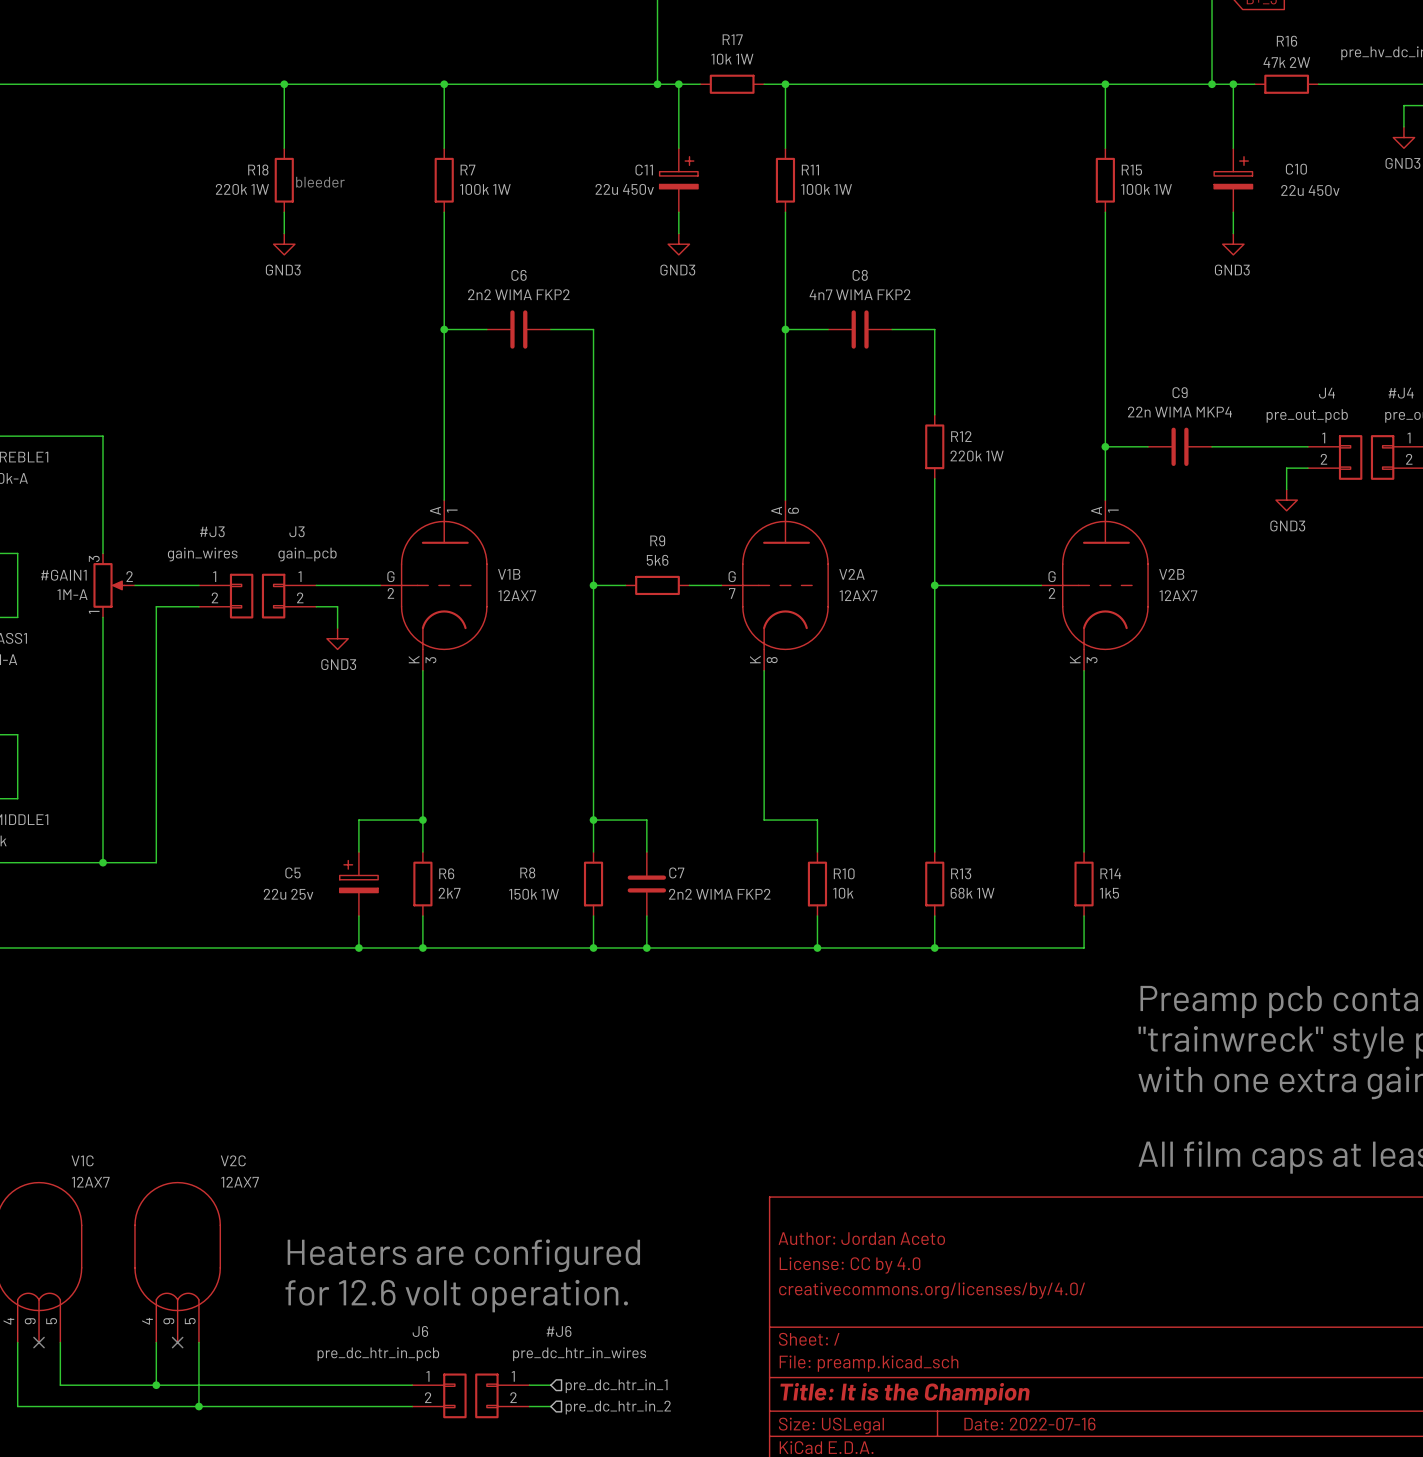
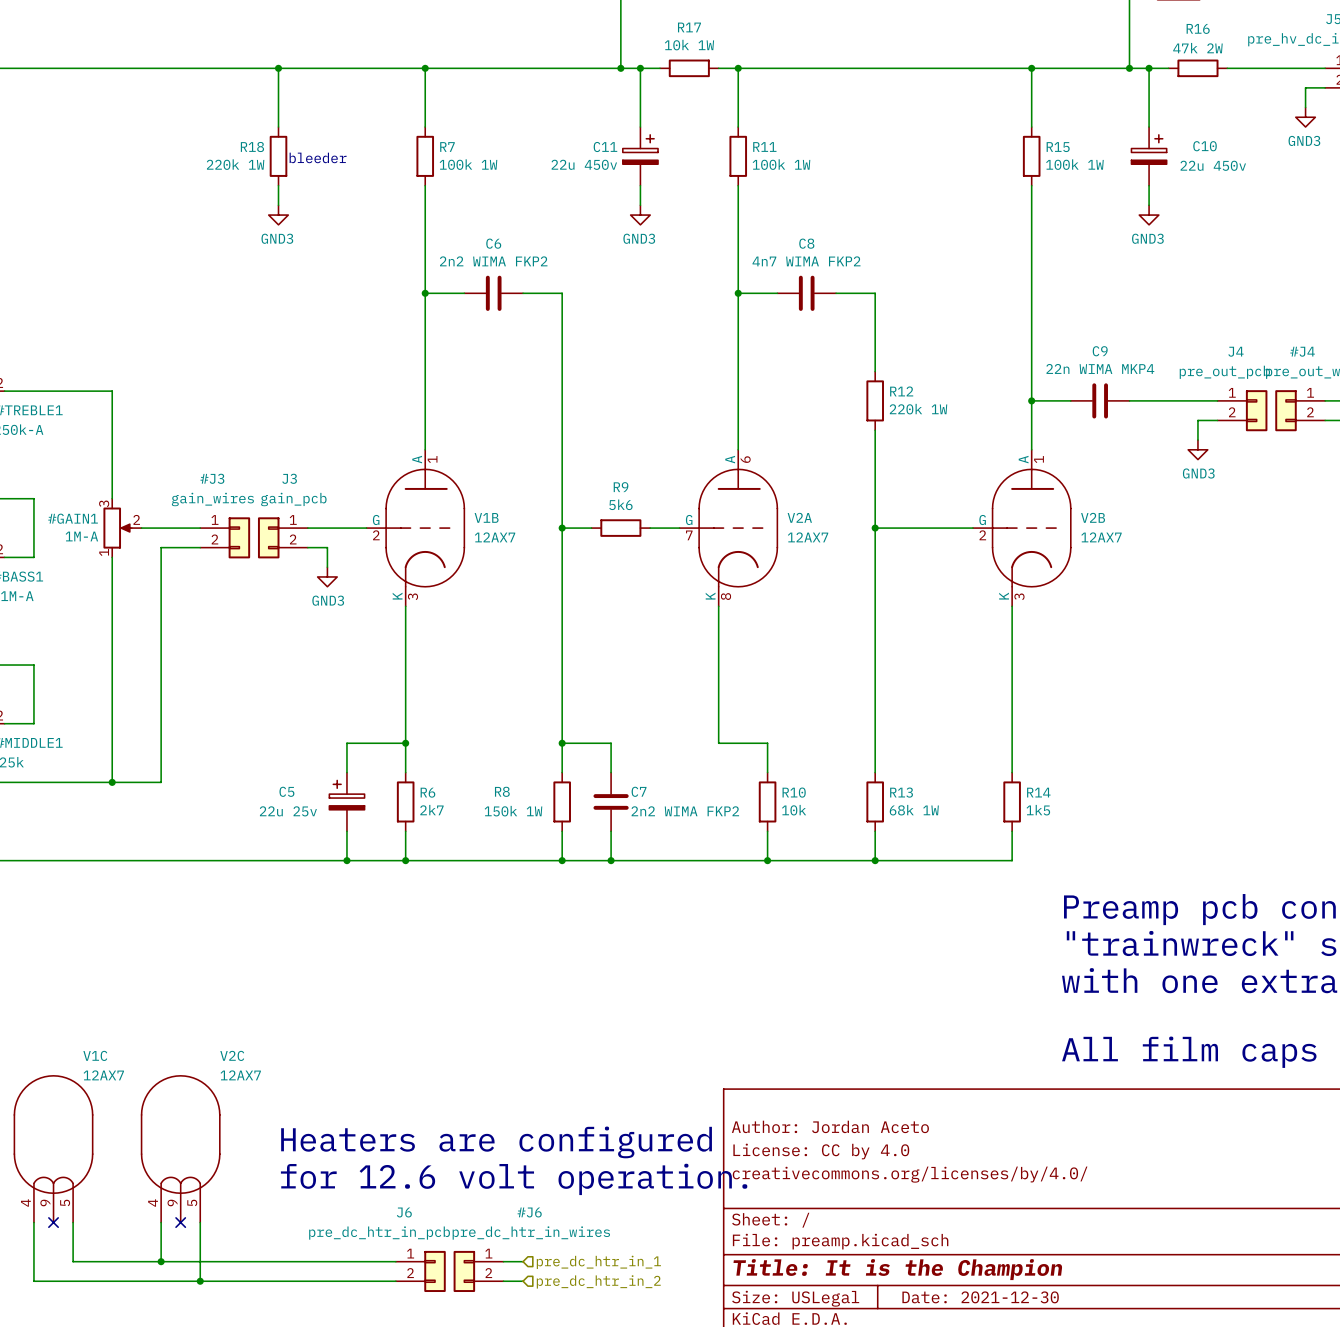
title block: Date: 2022-07-16 (1029, 1424) -> Date: 2021-12-30 (980, 1297)

